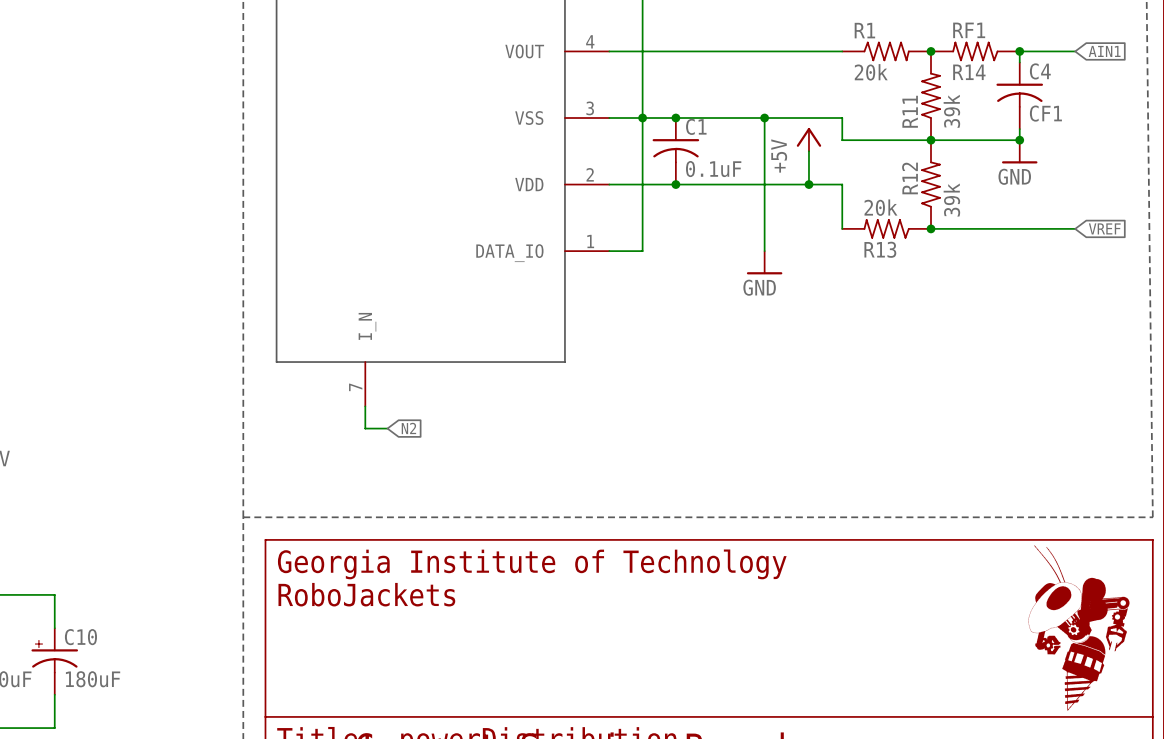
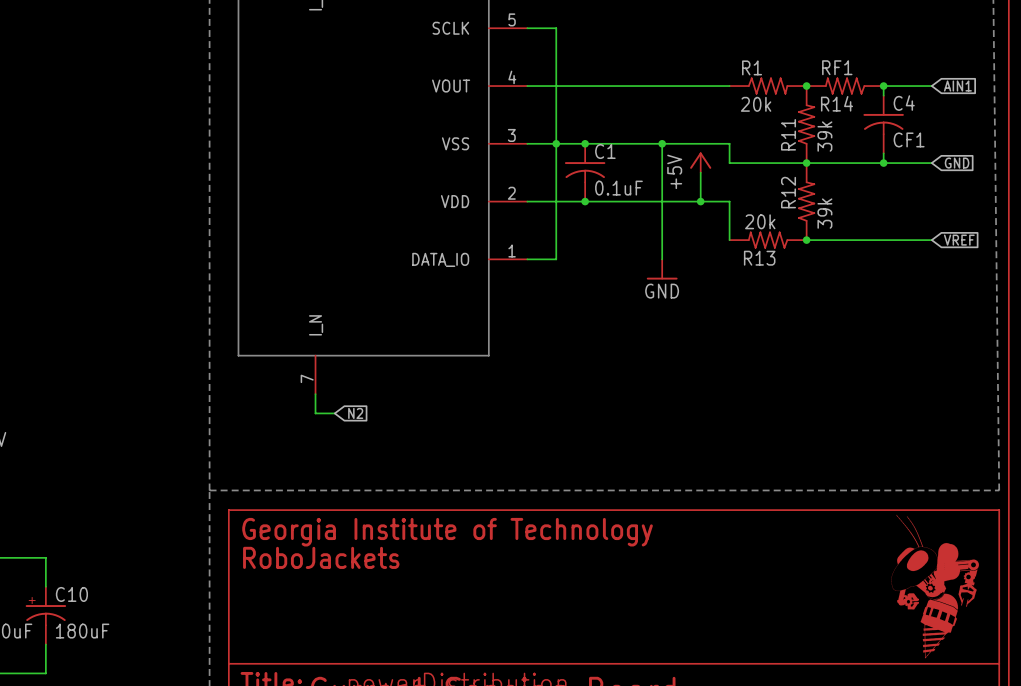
wire: none -> (883, 163) (931, 163)
global label: none -> GND (957, 163)
power symbol: GND (1019, 151) -> none

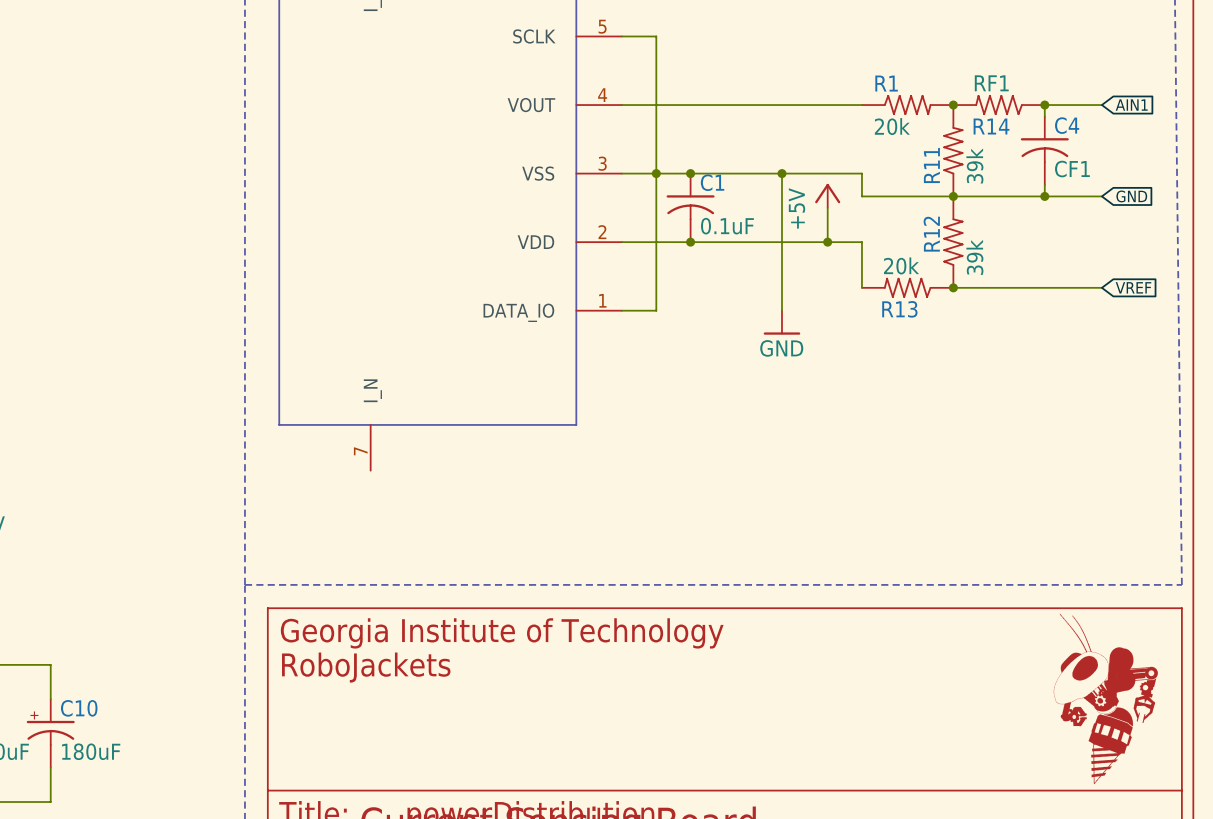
wire: (315, 394) (315, 413) (334, 413) -> none
global label: N2 (355, 413) -> none

